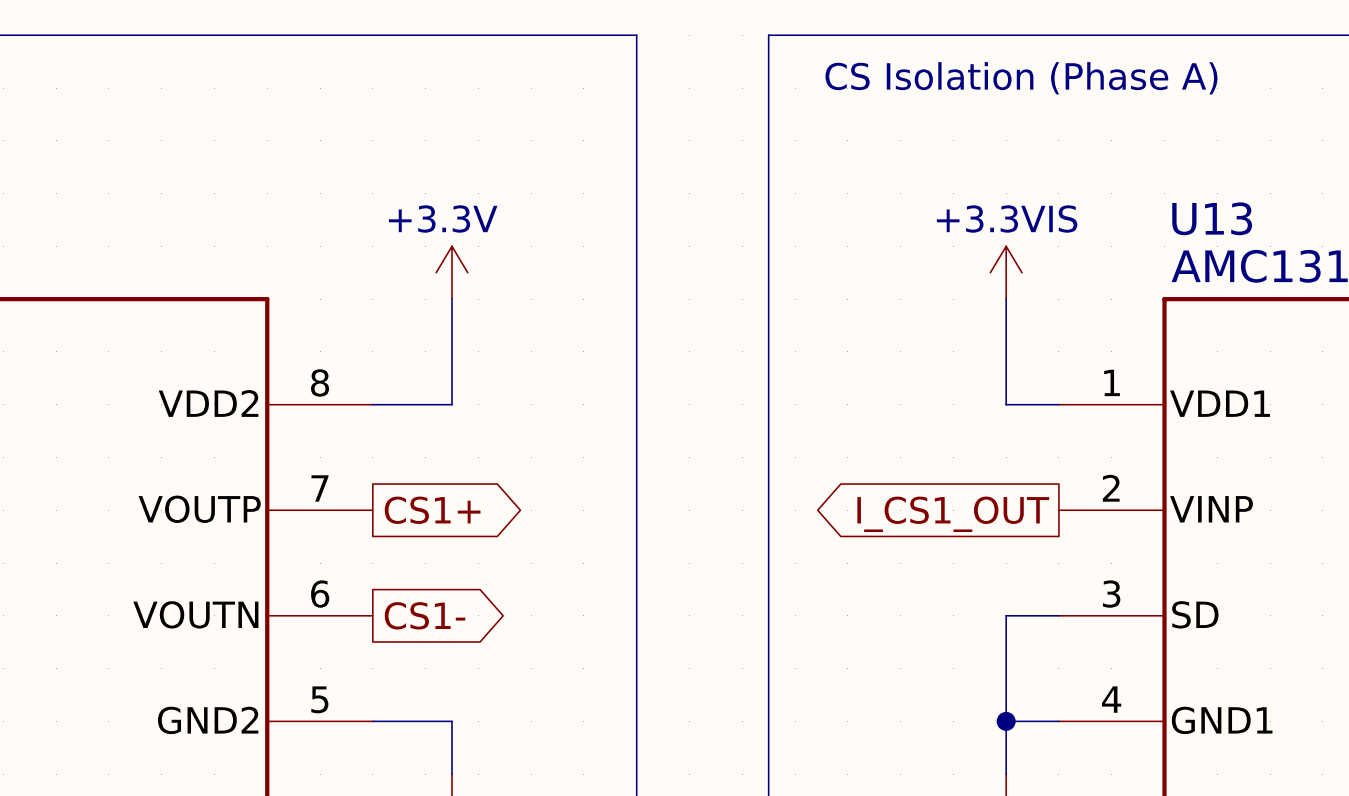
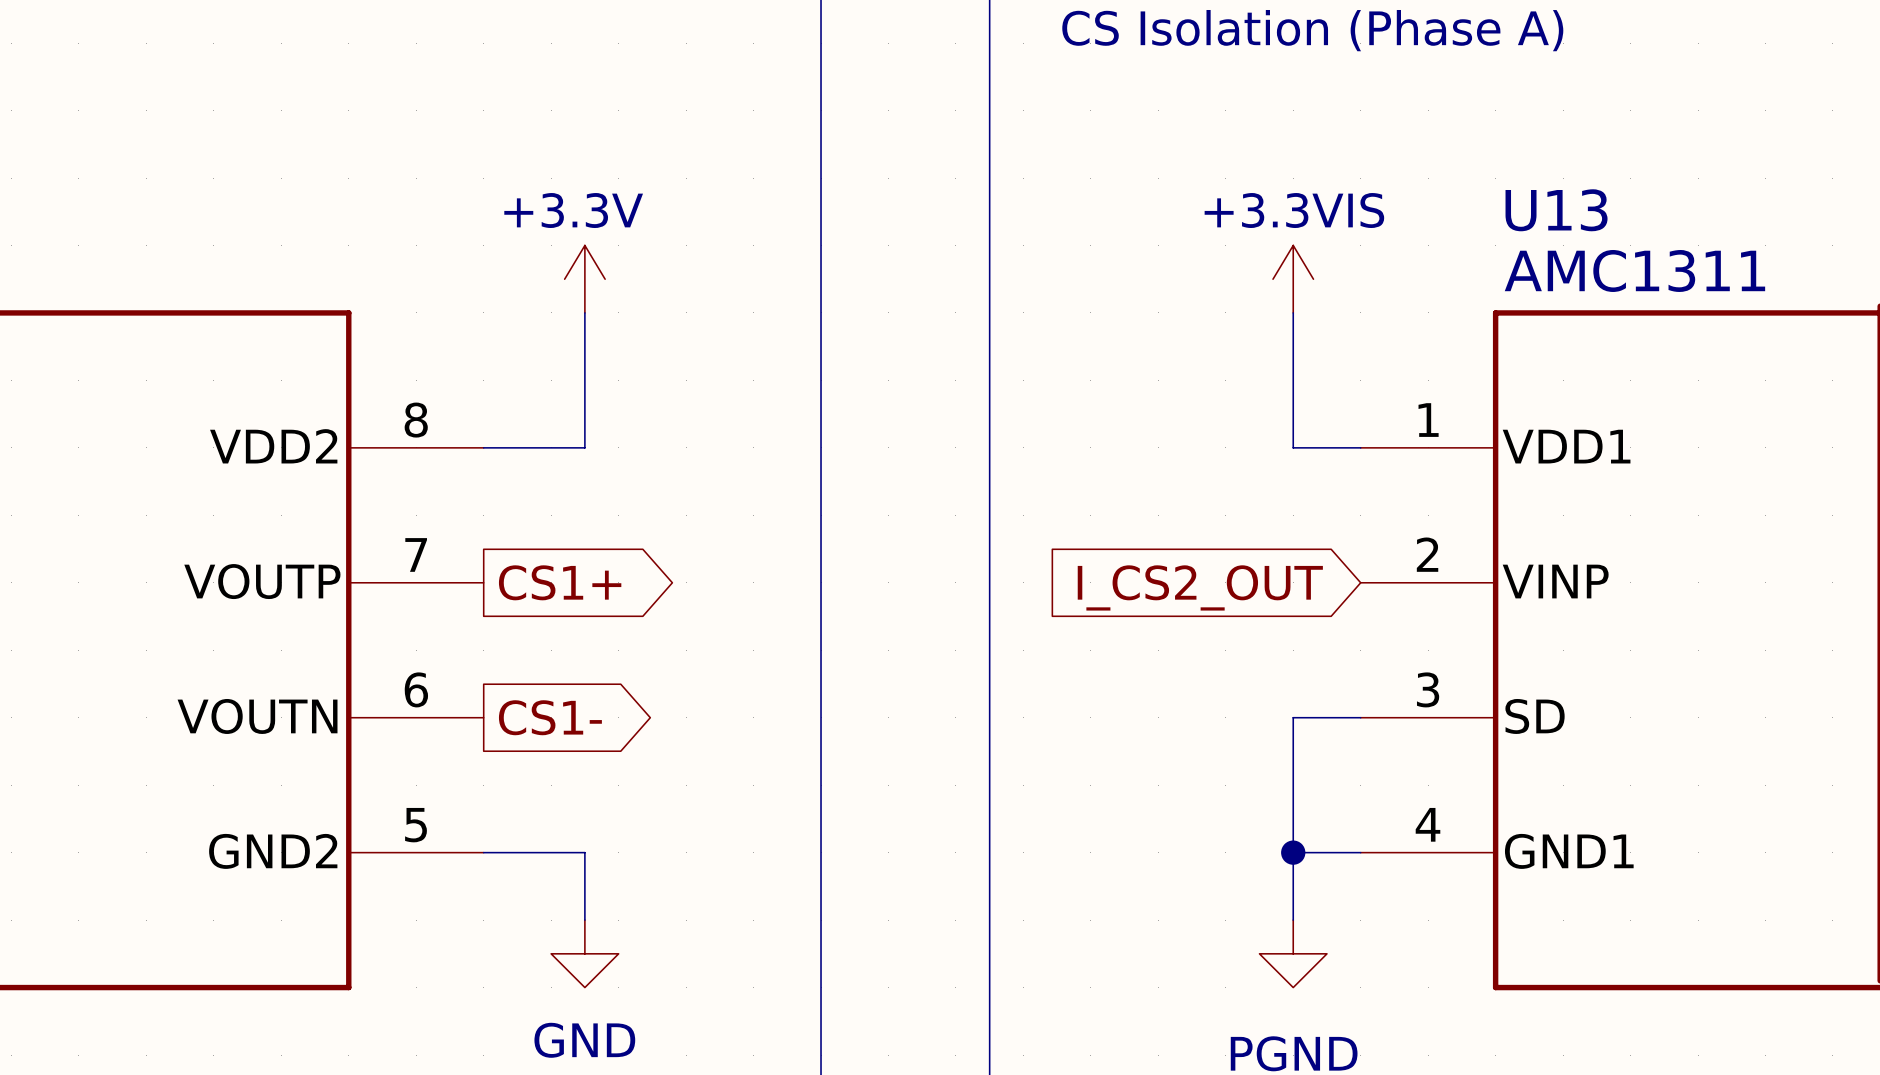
global label shape: output (953, 514) -> input (1200, 587)
global label: I_CS1_OUT (953, 514) -> I_CS2_OUT (1200, 587)

